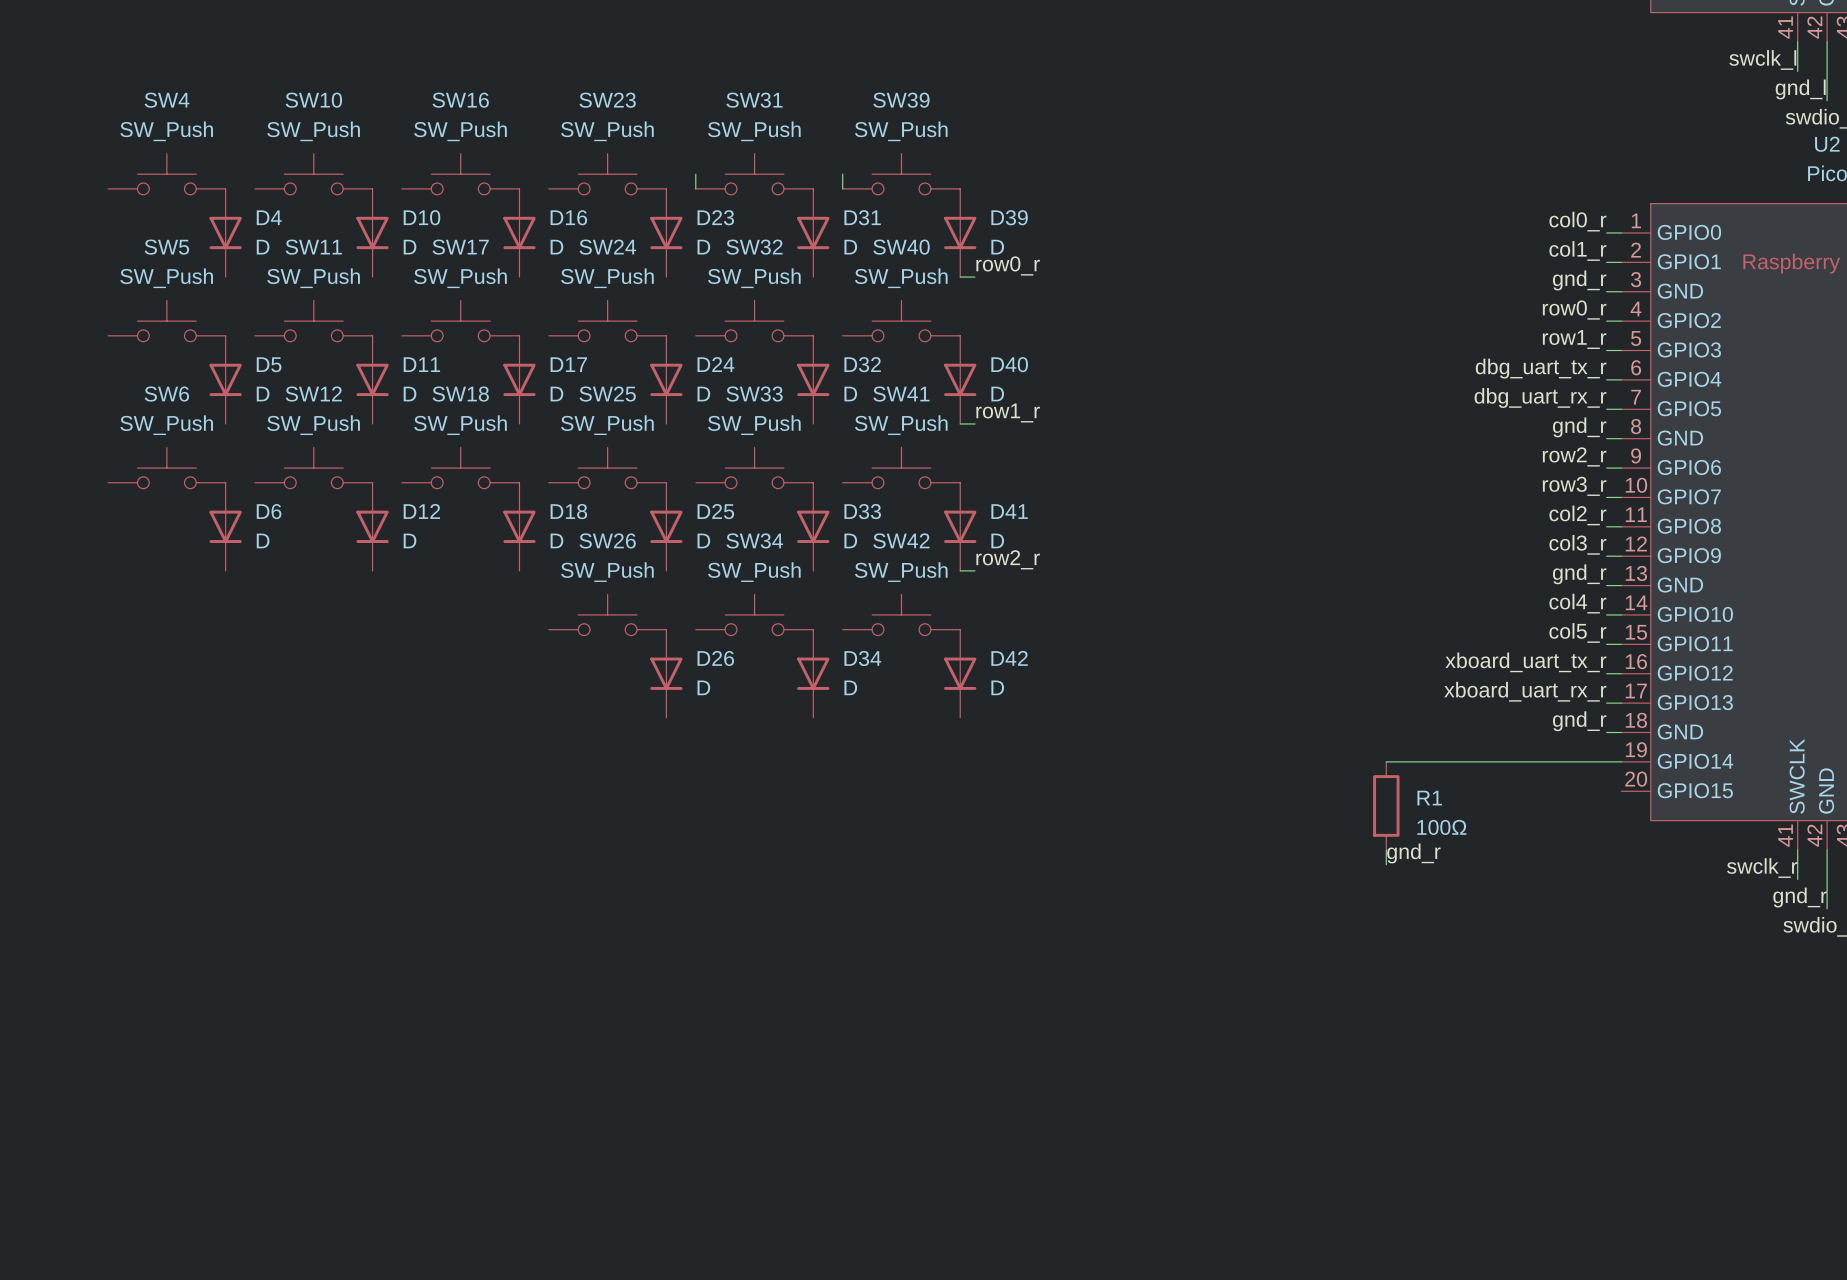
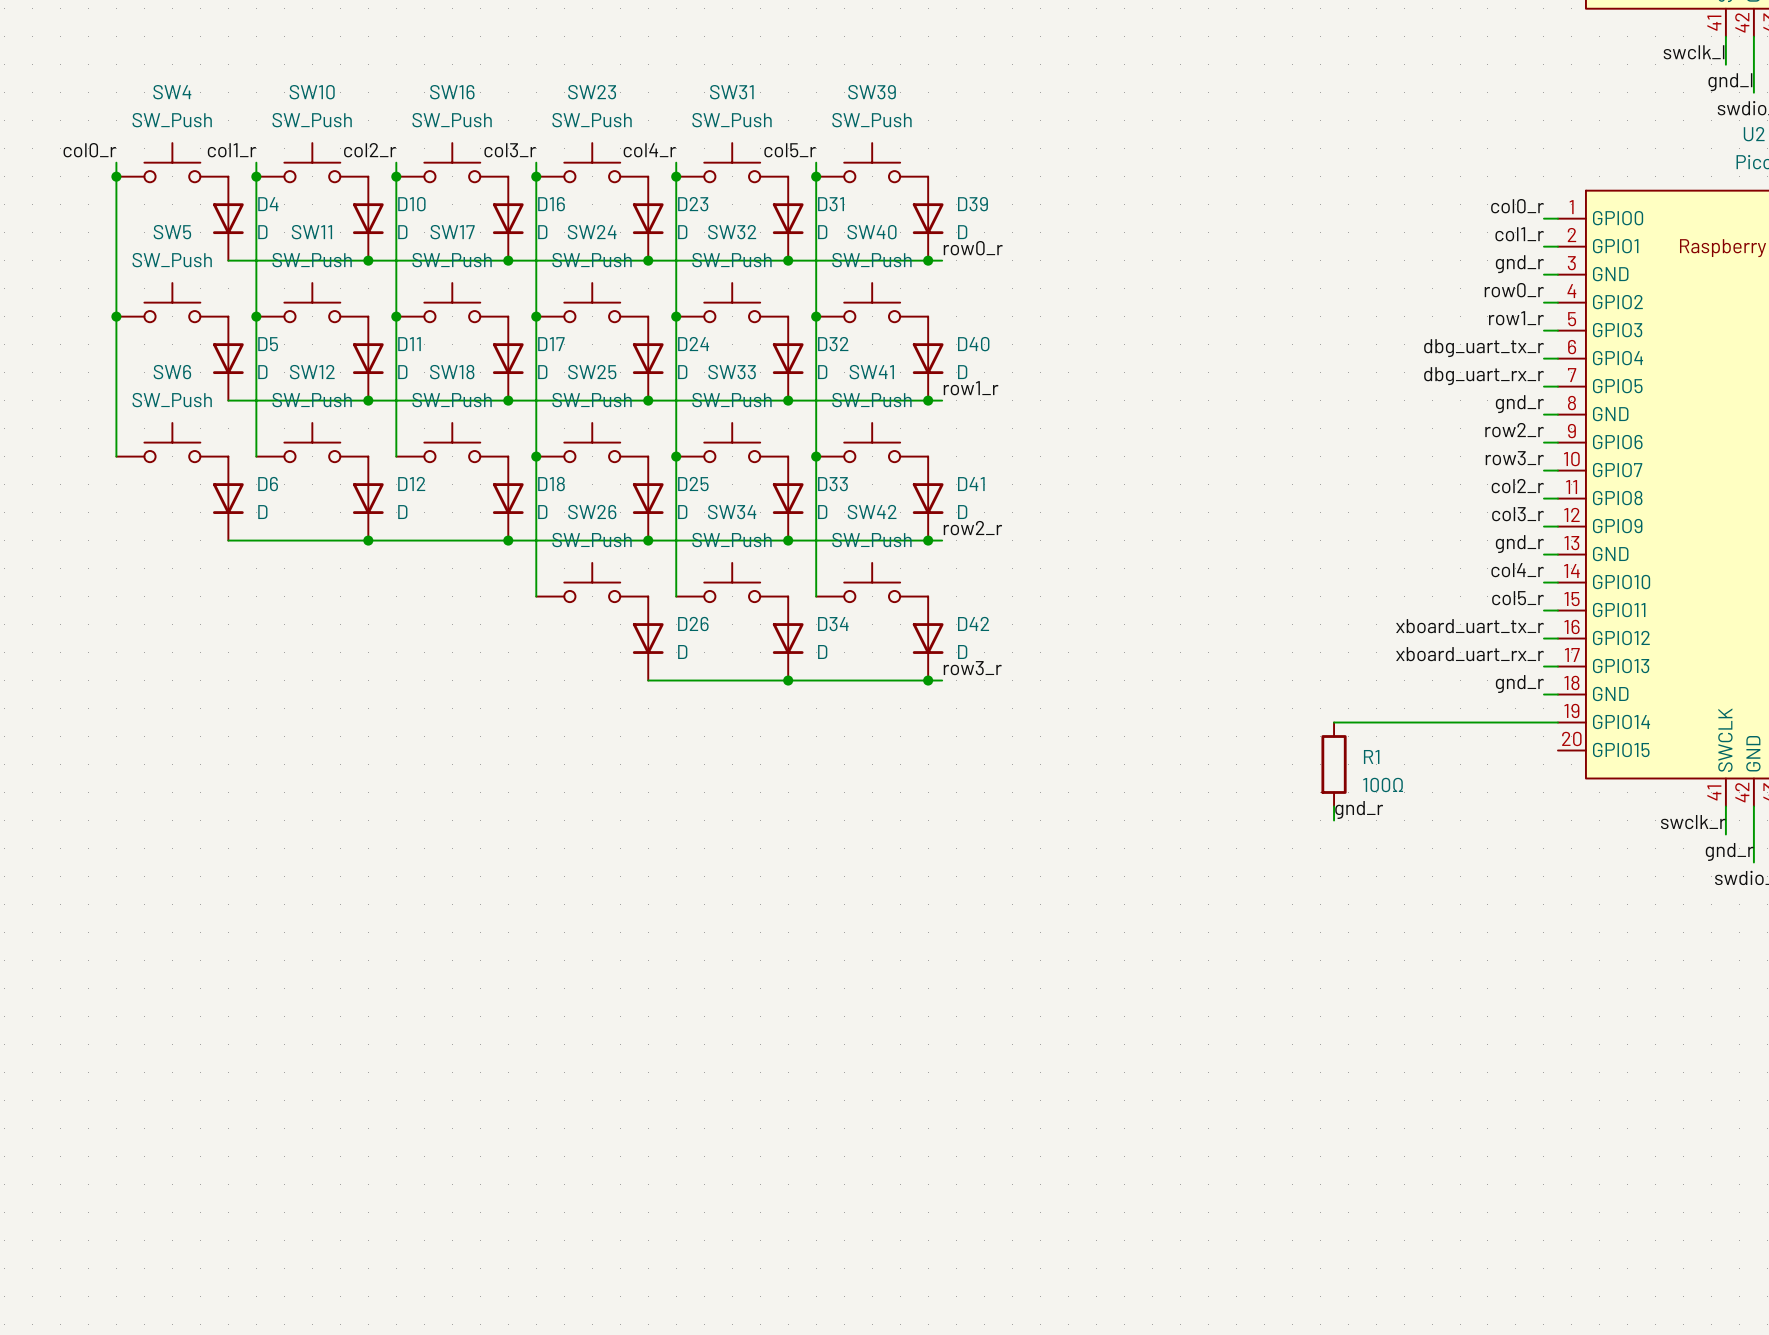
label: none -> col0_r (89, 150)
label: none -> col1_r (231, 150)
label: none -> col2_r (370, 150)
label: none -> col3_r (510, 150)
label: none -> col4_r (649, 150)
label: none -> col5_r (790, 150)
wire: none -> (116, 162) (116, 456)
wire: none -> (256, 162) (256, 456)
wire: none -> (396, 162) (396, 456)
wire: none -> (536, 162) (536, 596)
junction: none -> (116, 176)
junction: none -> (256, 176)
junction: none -> (396, 176)
junction: none -> (536, 176)
wire: none -> (676, 176) (676, 596)
junction: none -> (676, 176)
wire: none -> (816, 176) (816, 596)
junction: none -> (816, 176)
wire: none -> (228, 260) (928, 260)
junction: none -> (368, 260)
junction: none -> (508, 260)
junction: none -> (648, 260)
junction: none -> (788, 260)
junction: none -> (928, 260)
junction: none -> (116, 316)
junction: none -> (256, 316)
junction: none -> (396, 316)
junction: none -> (536, 316)
junction: none -> (676, 316)
junction: none -> (816, 316)
wire: none -> (228, 400) (928, 400)
junction: none -> (368, 400)
junction: none -> (508, 400)
junction: none -> (648, 400)
junction: none -> (788, 400)
junction: none -> (928, 400)
junction: none -> (536, 456)
junction: none -> (676, 456)
junction: none -> (816, 456)
wire: none -> (228, 540) (928, 540)
junction: none -> (368, 540)
junction: none -> (508, 540)
junction: none -> (648, 540)
junction: none -> (788, 540)
junction: none -> (928, 540)
label: none -> row3_r (972, 668)
wire: none -> (648, 680) (942, 680)
junction: none -> (788, 680)
junction: none -> (928, 680)

